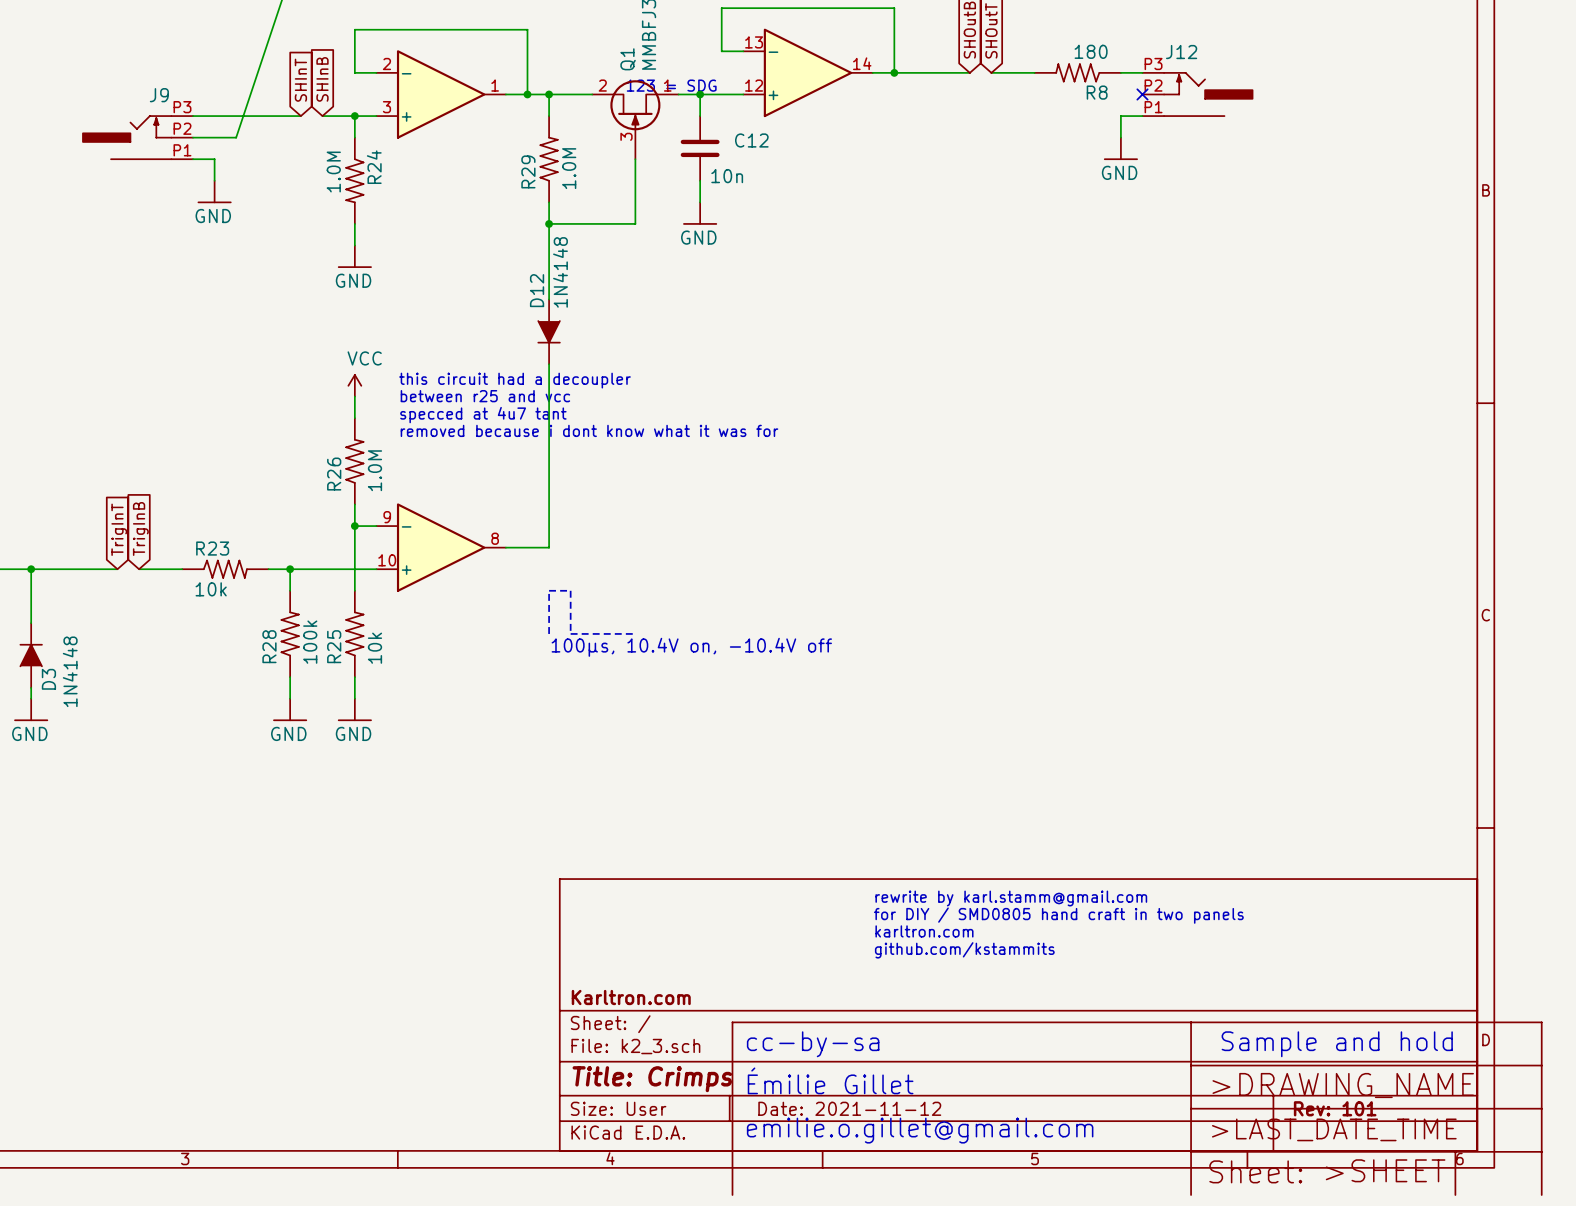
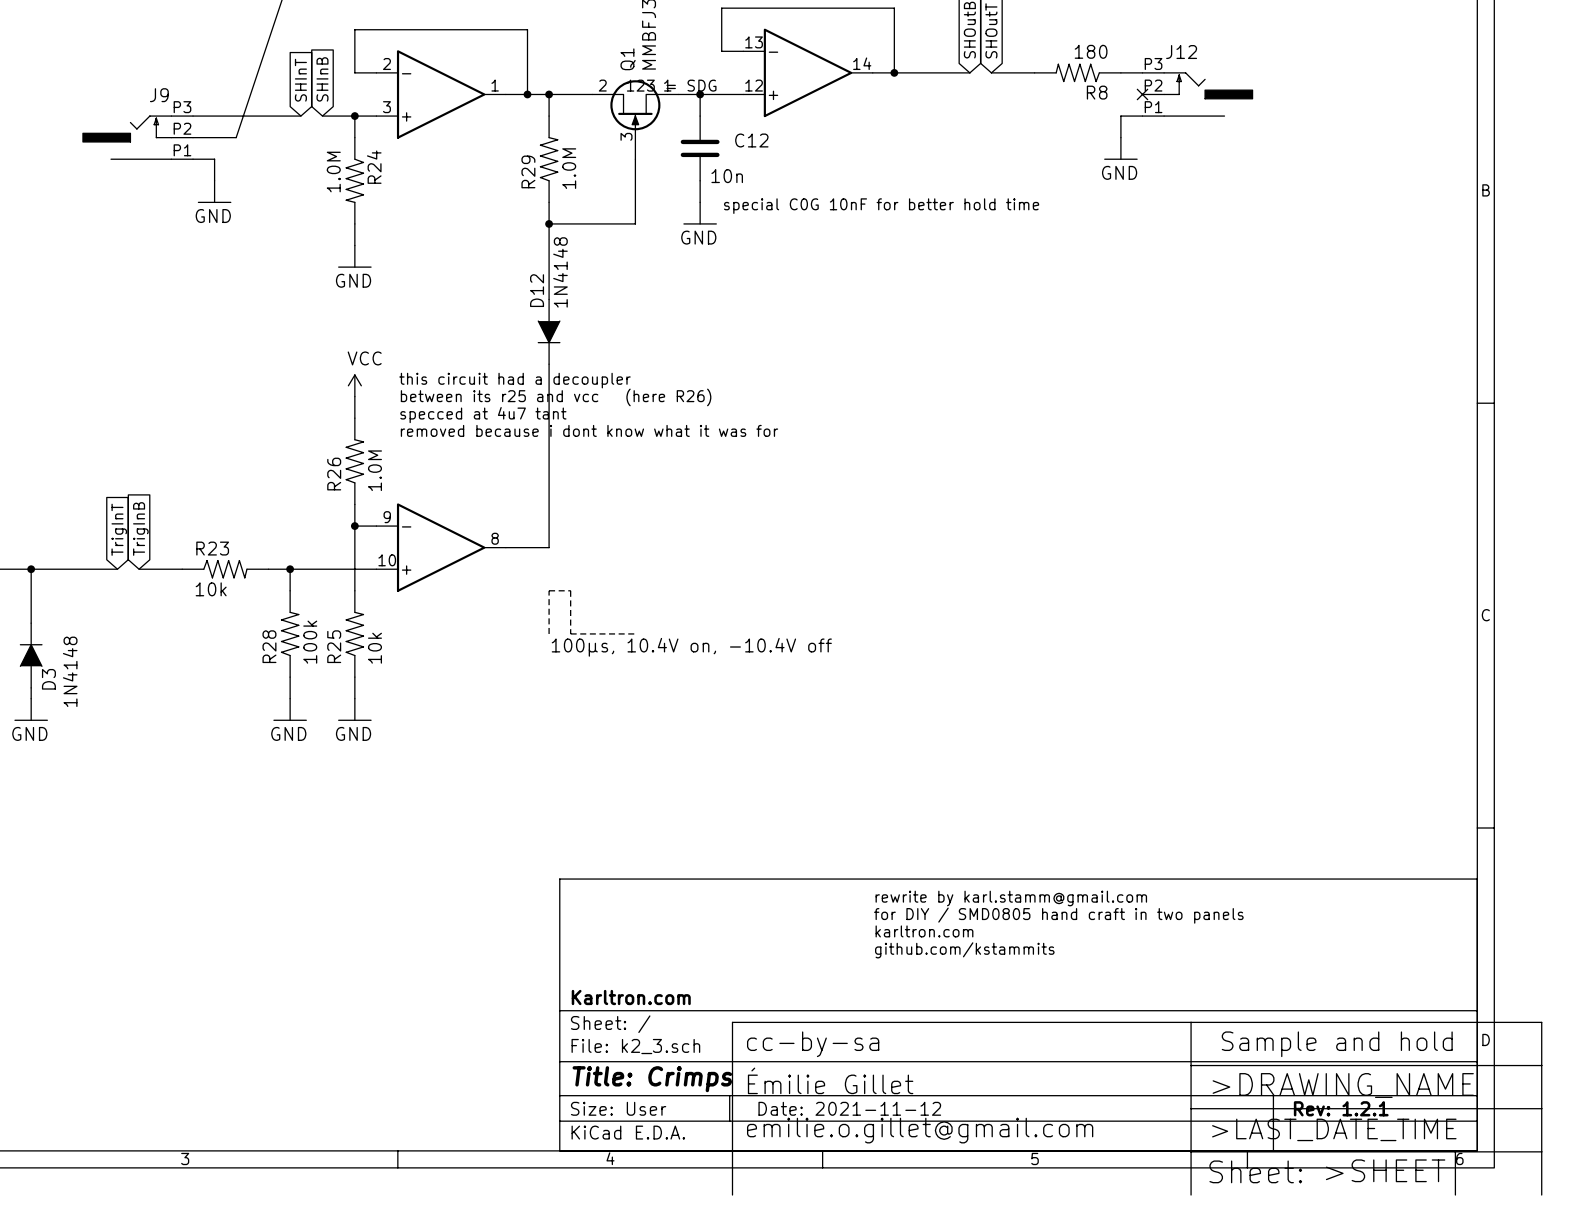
text: none -> special C0G 10nF for better hold time (881, 206)
text: between r25 and vcc (485, 396) -> between its r25 and vcc (here R26) (556, 397)
title block: Rev: 101 (1335, 1108) -> Rev: 1.2.1 (1341, 1108)

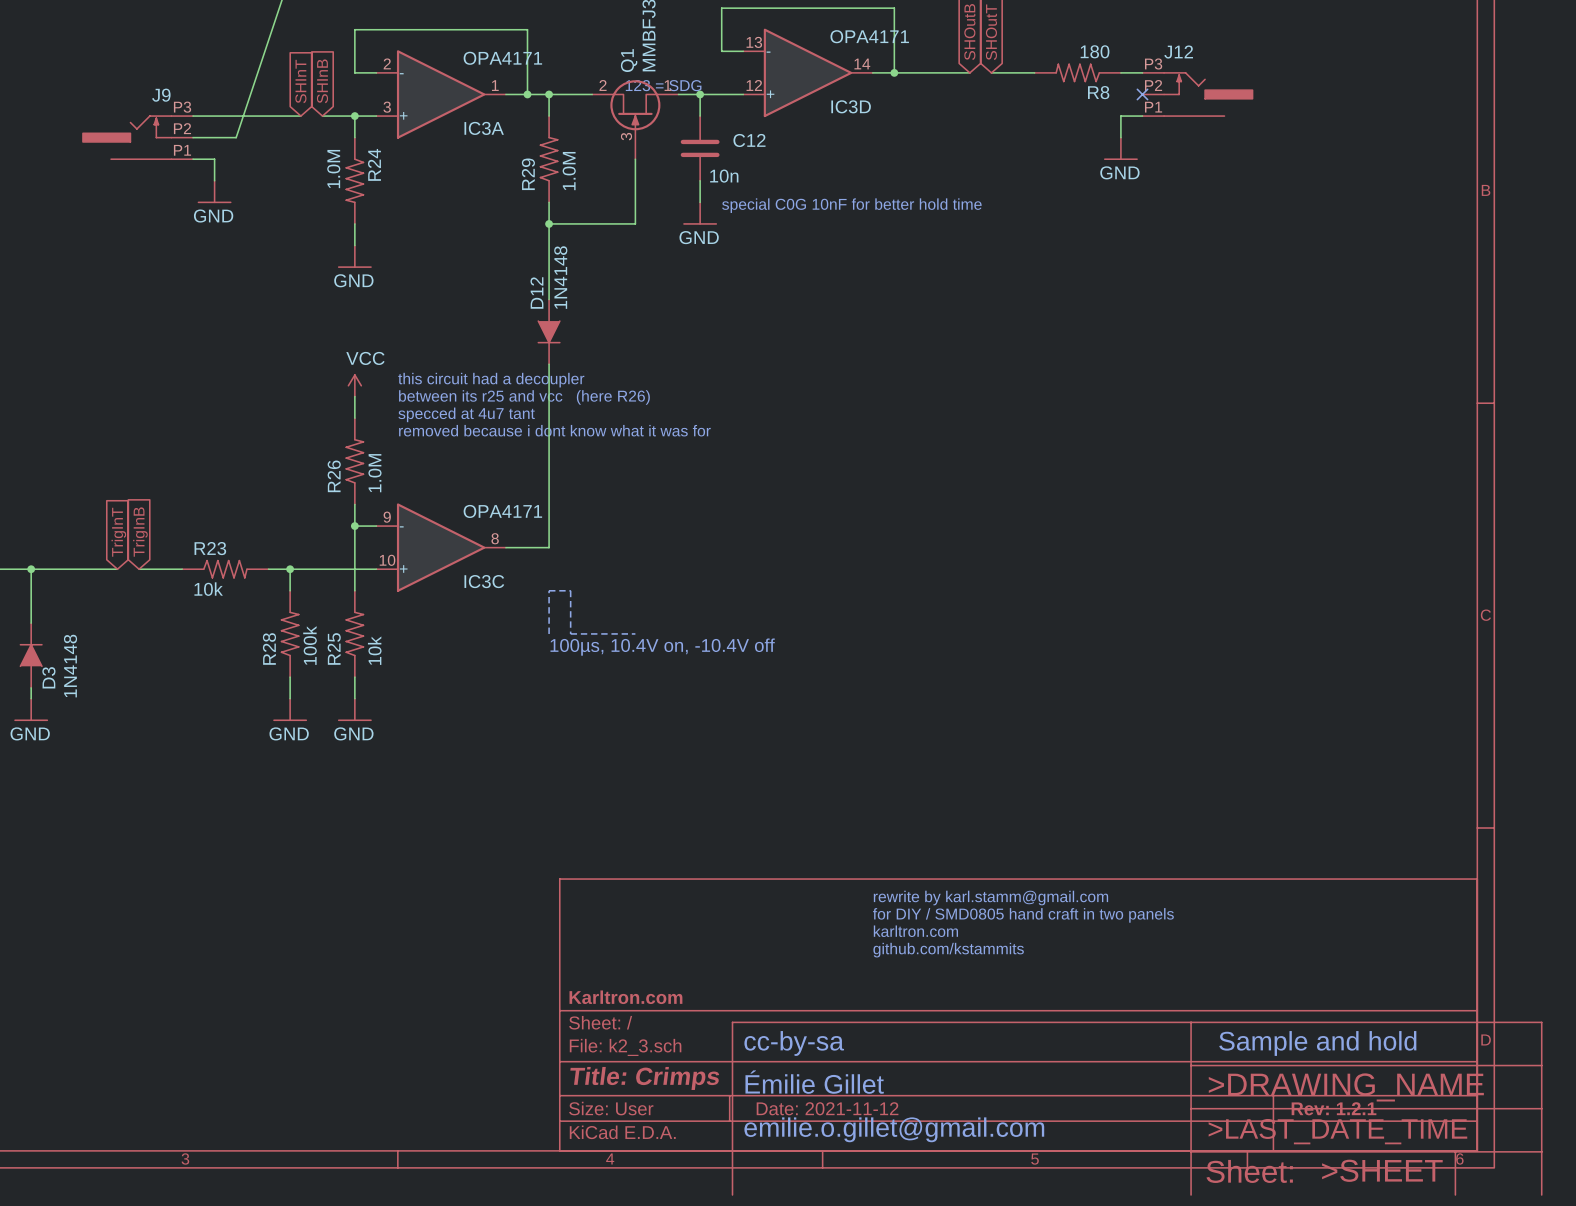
IC3D value: none -> OPA4171 (869, 36)
IC3A value: none -> OPA4171 (502, 58)
IC3D name: none -> IC3D (851, 106)
IC3A name: none -> IC3A (484, 128)
IC3C value: none -> OPA4171 (502, 511)
IC3C name: none -> IC3C (484, 581)

